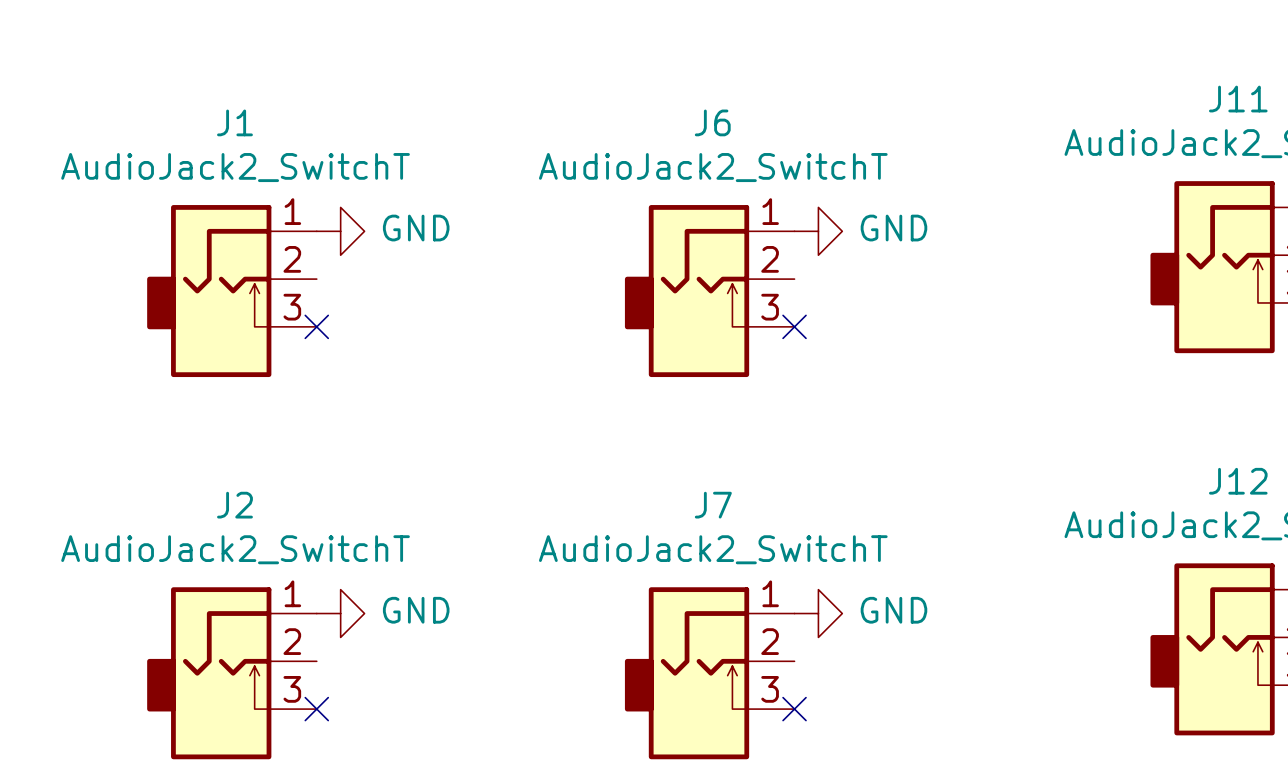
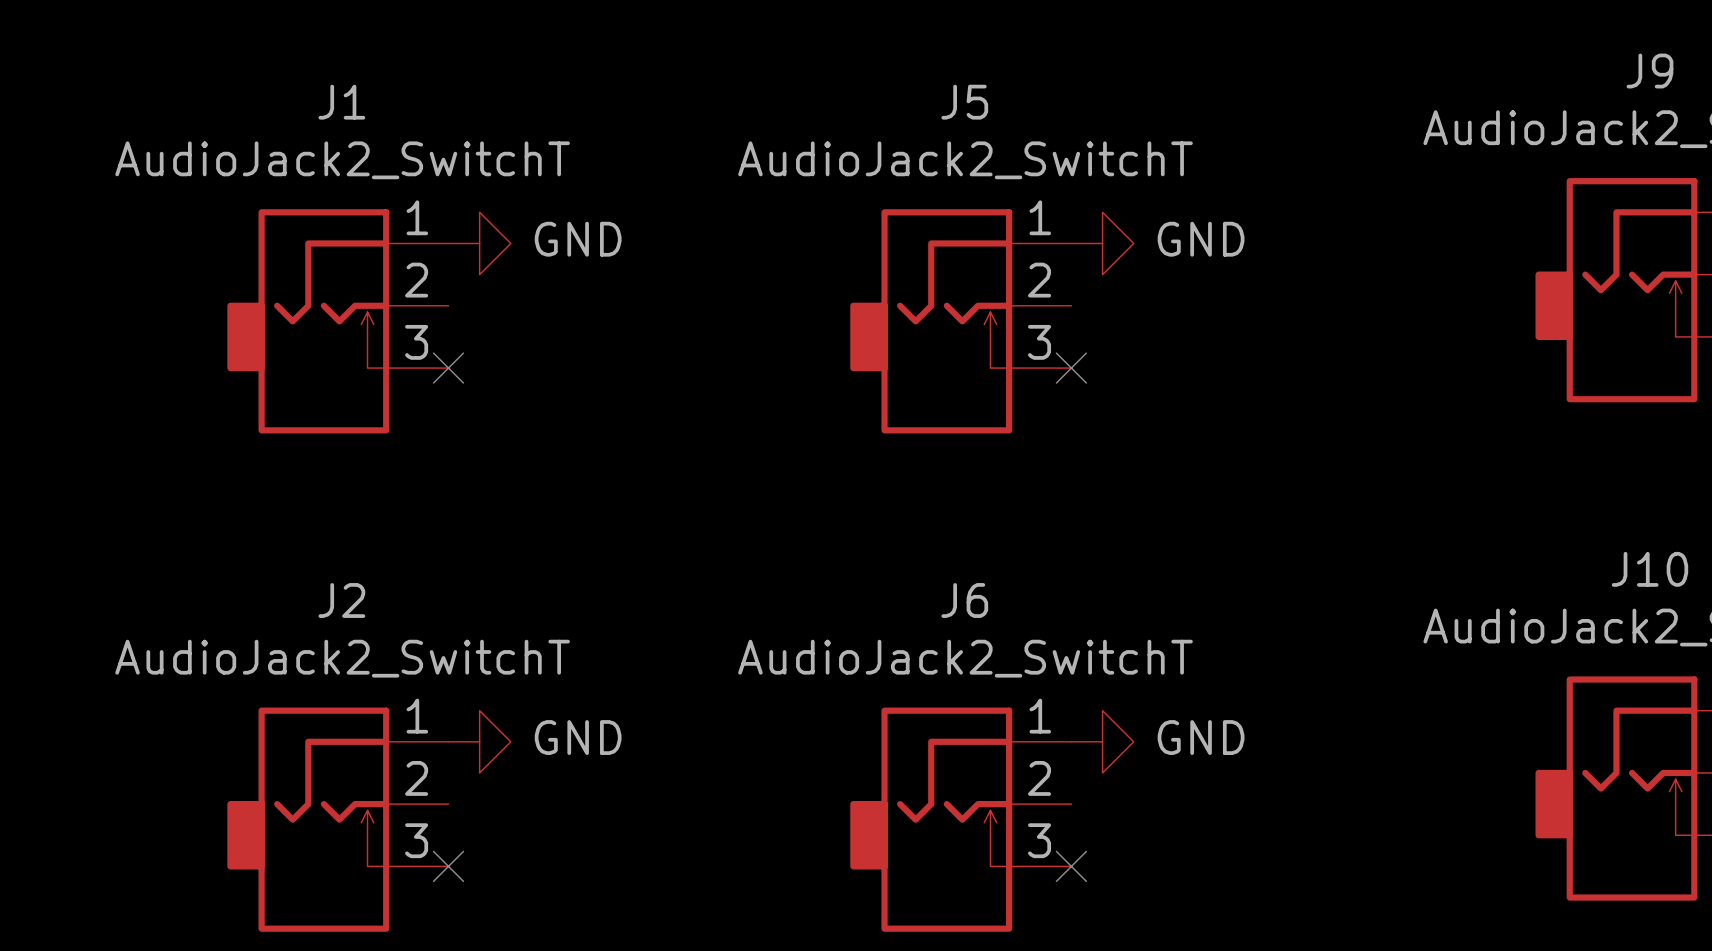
J11 name: J11 (1238, 99) -> J9 (1649, 71)
J6 name: J6 (712, 122) -> J5 (964, 102)
J12 name: J12 (1238, 481) -> J10 (1649, 569)
J7 name: J7 (713, 505) -> J6 (964, 600)

